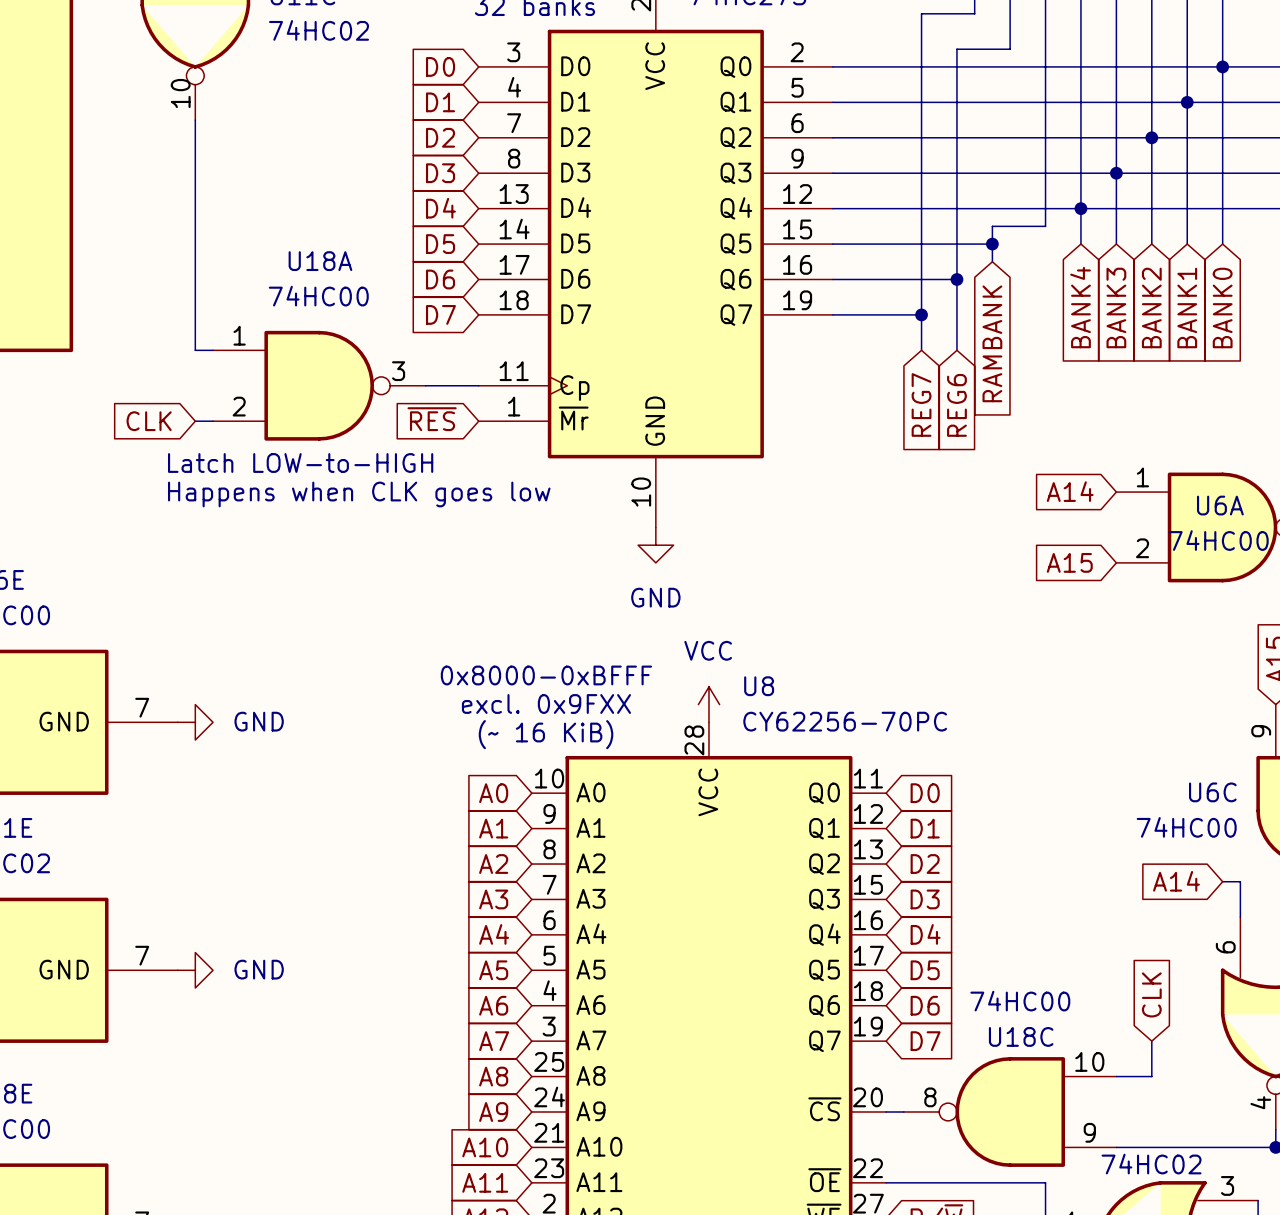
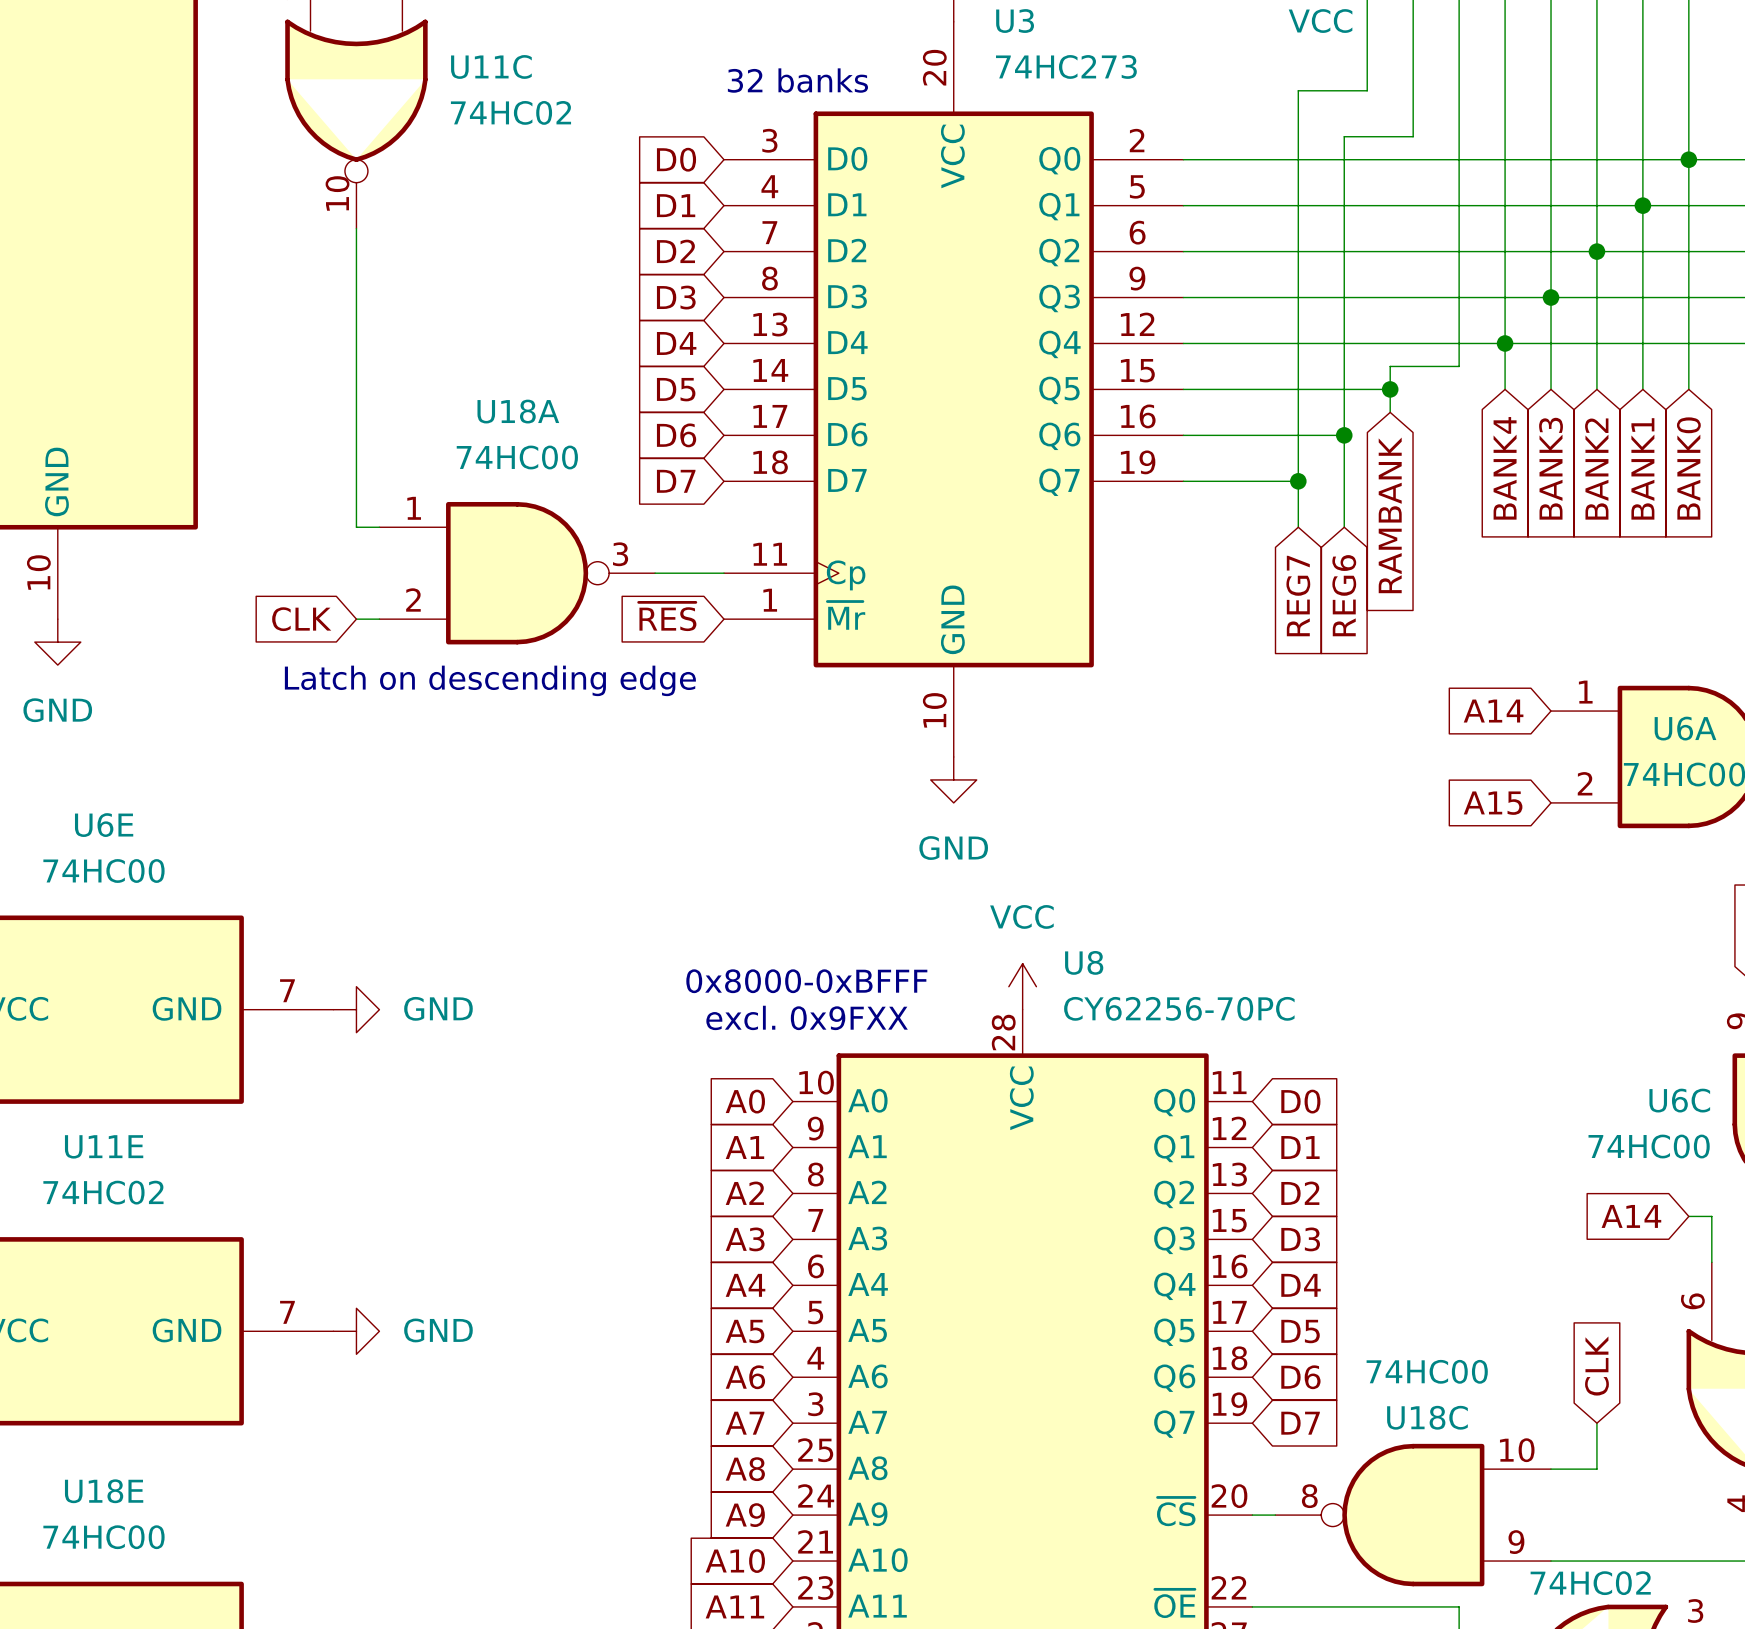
text: Latch LOW-to-HIGH (300, 463) -> none
text: none -> Latch on descending edge (490, 680)
text: Happens when CLK goes low (359, 494) -> none
text: 0x8000-0xBFFF (546, 675) -> none
text: excl. 0x9FXX (546, 703) -> 0x8000-0xBFFF (806, 981)
text: (~ 16 KiB) (546, 734) -> excl. 0x9FXX (807, 1017)

